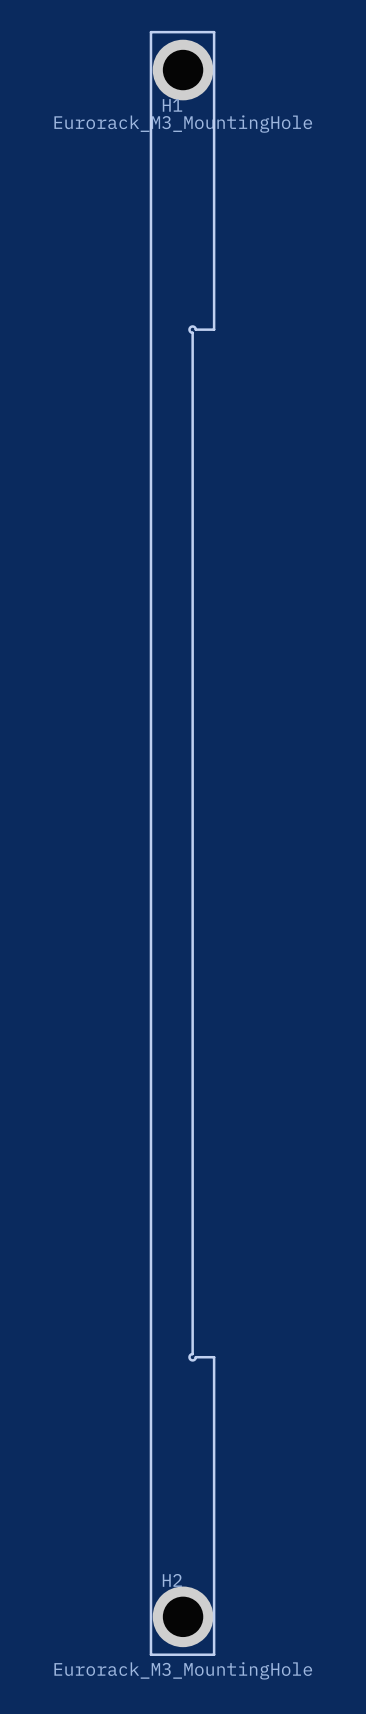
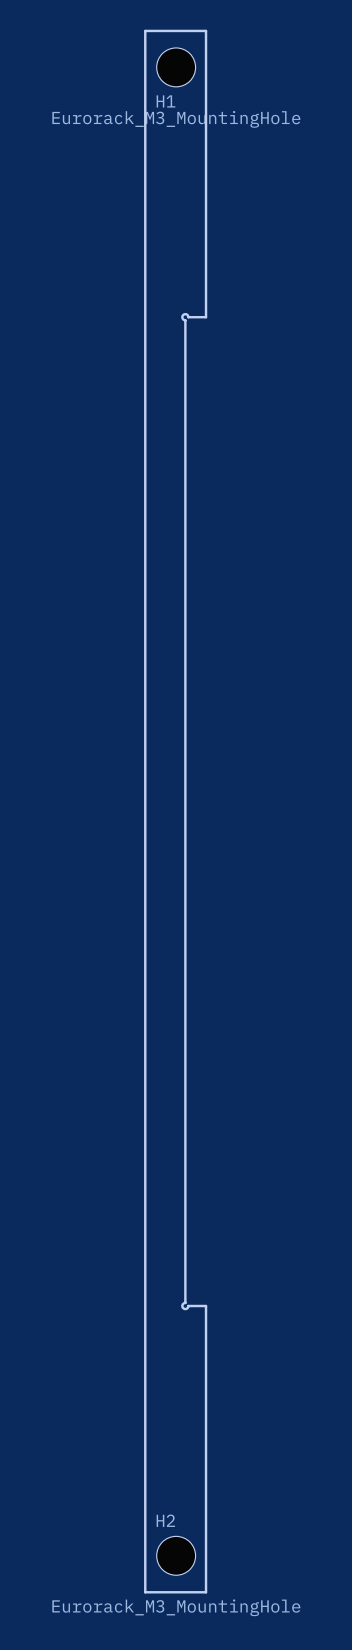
H1 footprint: [152, 39, 214, 101] -> [156, 47, 196, 87]
H2 footprint: [152, 1586, 214, 1648] -> [156, 1536, 196, 1576]

